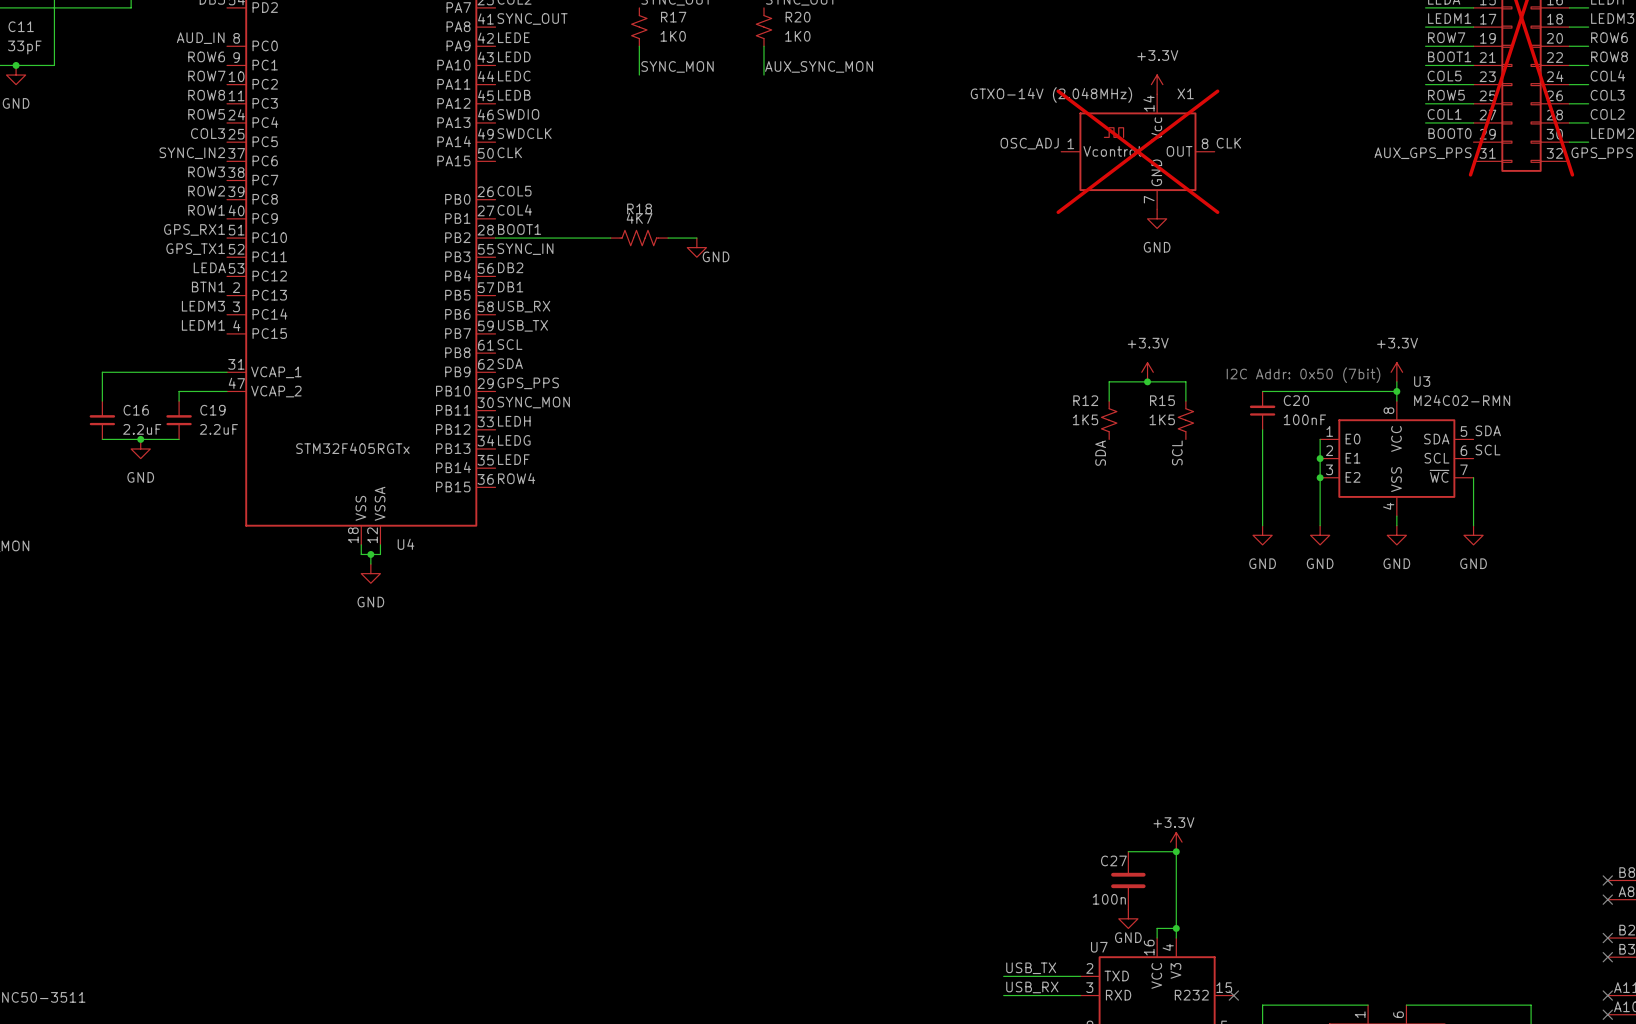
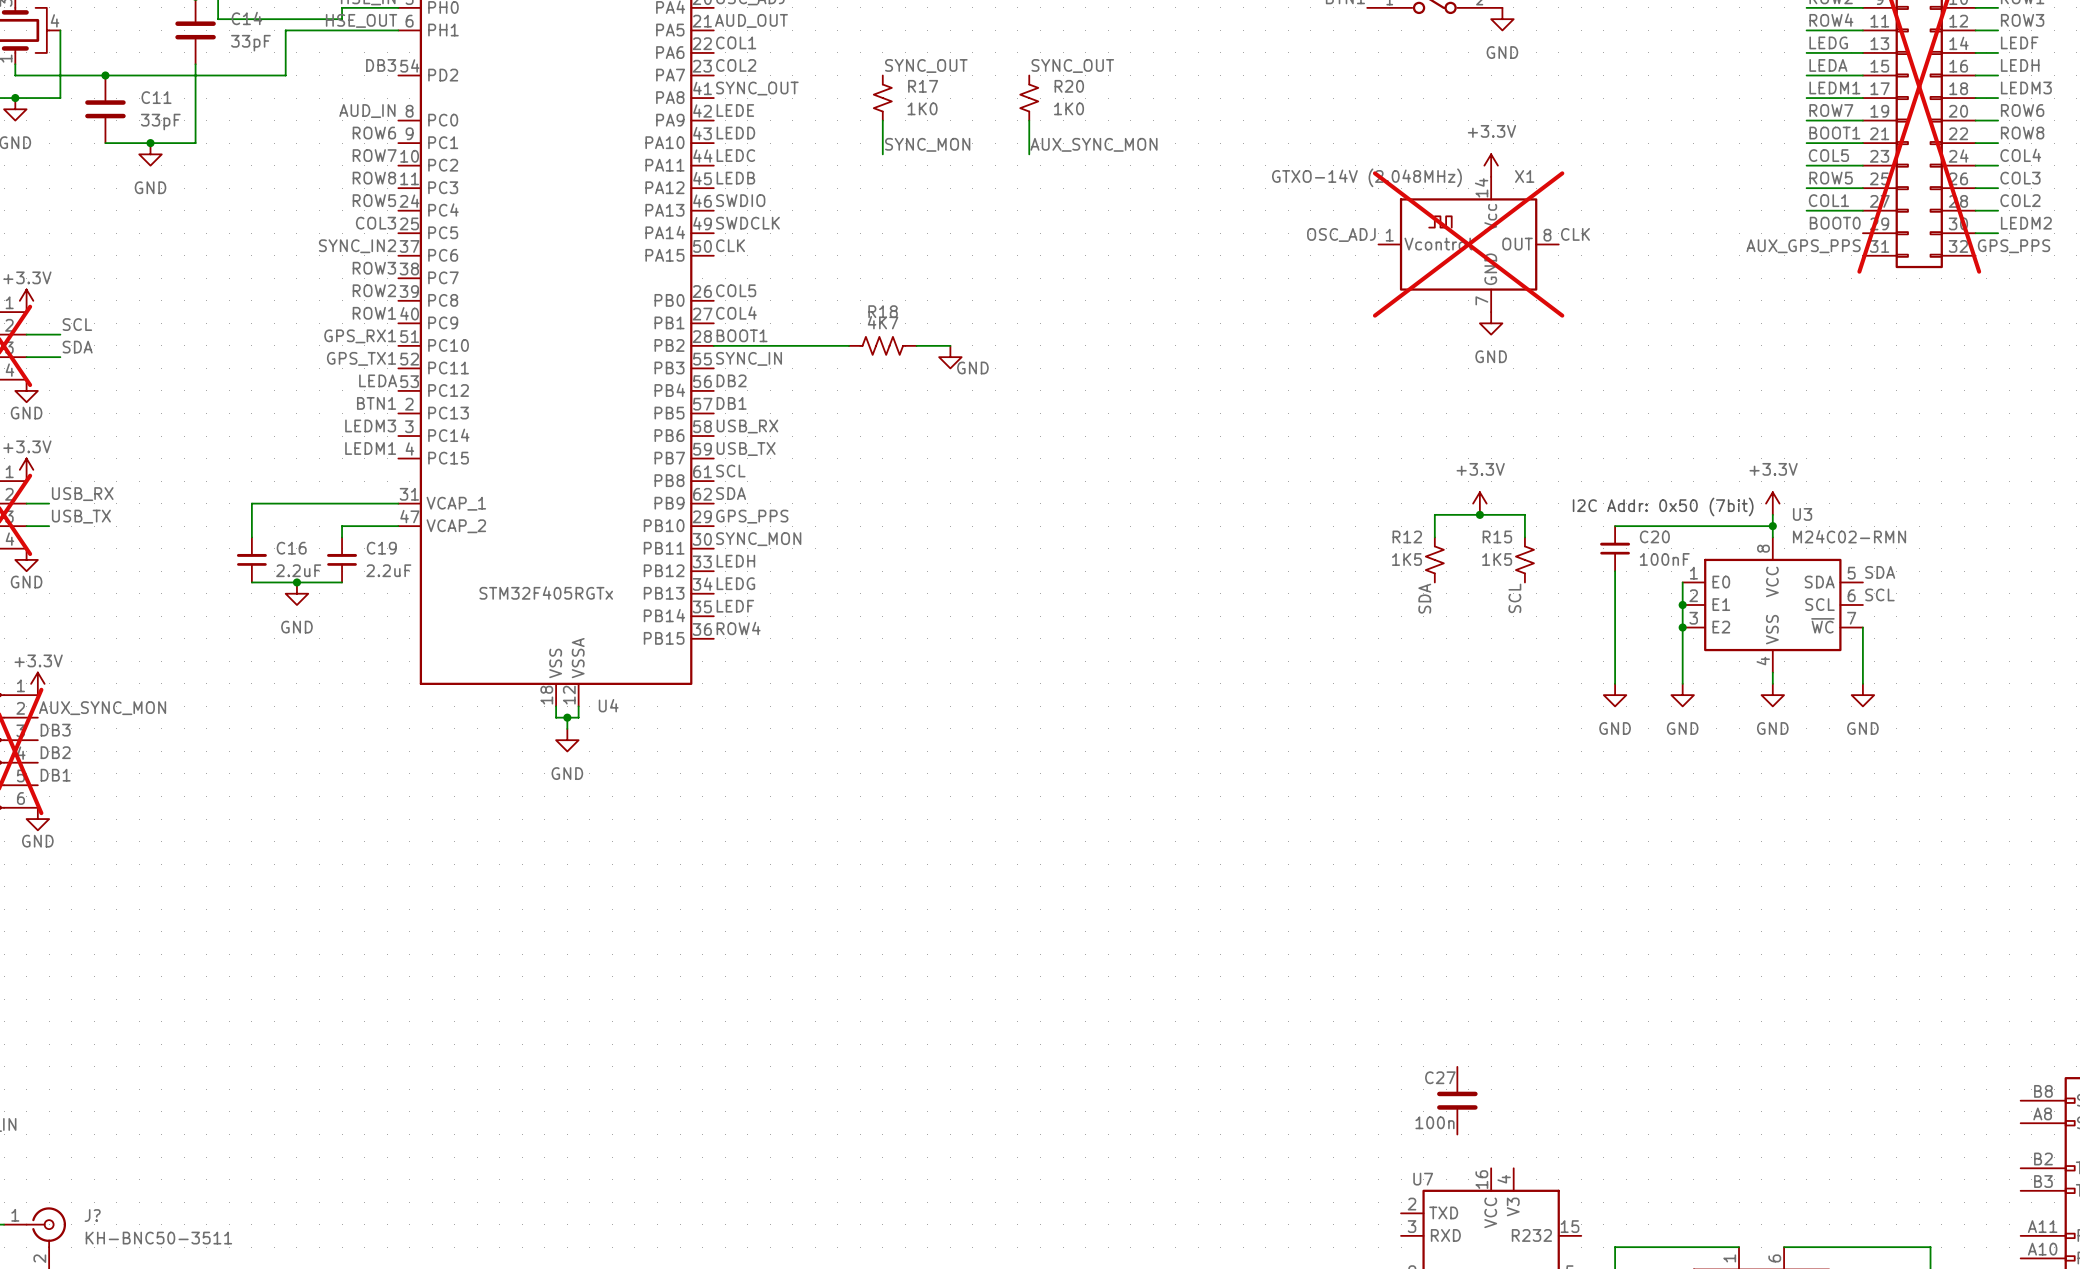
power symbol: +3.3V (1176, 842) -> none
wire: (1128, 851) (1176, 851) (1176, 938) -> none
junction: (1176, 851) -> none
no-connect mark: (1607, 880) -> none
no-connect mark: (1607, 899) -> none
power symbol: GND (1128, 918) -> none
wire: (1176, 928) (1157, 928) (1157, 938) -> none
junction: (1176, 928) -> none
no-connect mark: (1607, 938) -> none
no-connect mark: (1607, 957) -> none
label: USB_TX (1031, 968) -> none
wire: (1003, 976) (1080, 976) -> none
label: USB_RX (1032, 987) -> none
wire: (1003, 995) (1080, 995) -> none
no-connect mark: (1233, 995) -> none
no-connect mark: (1607, 995) -> none
no-connect mark: (1607, 1014) -> none

